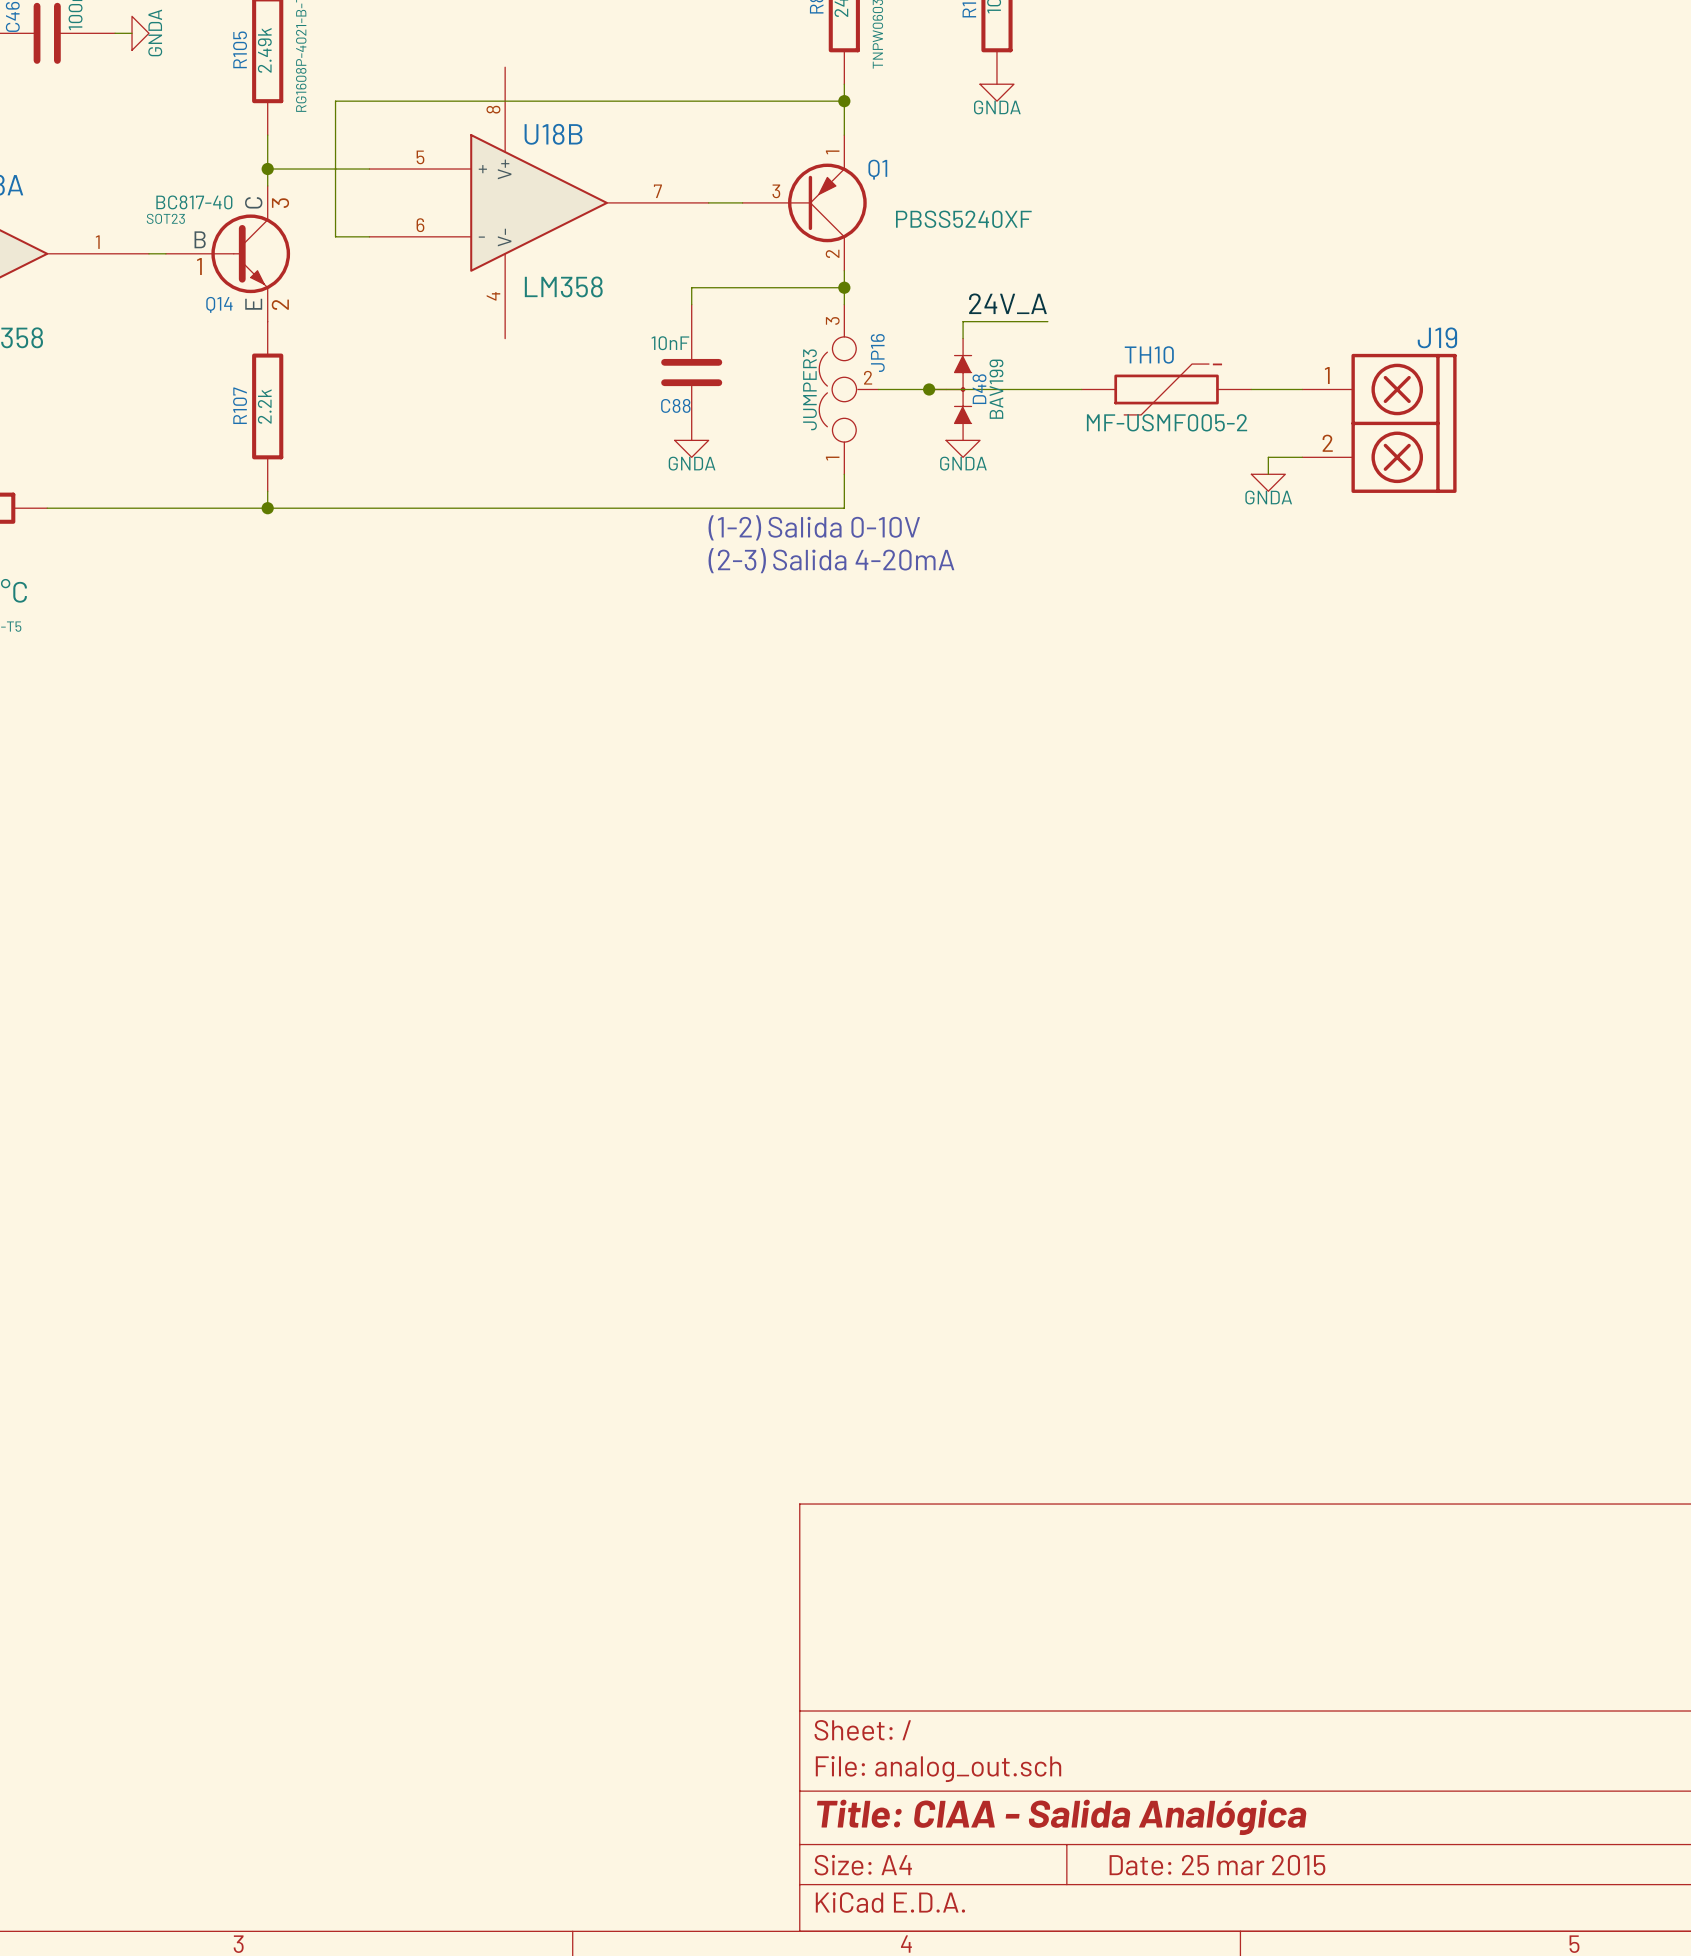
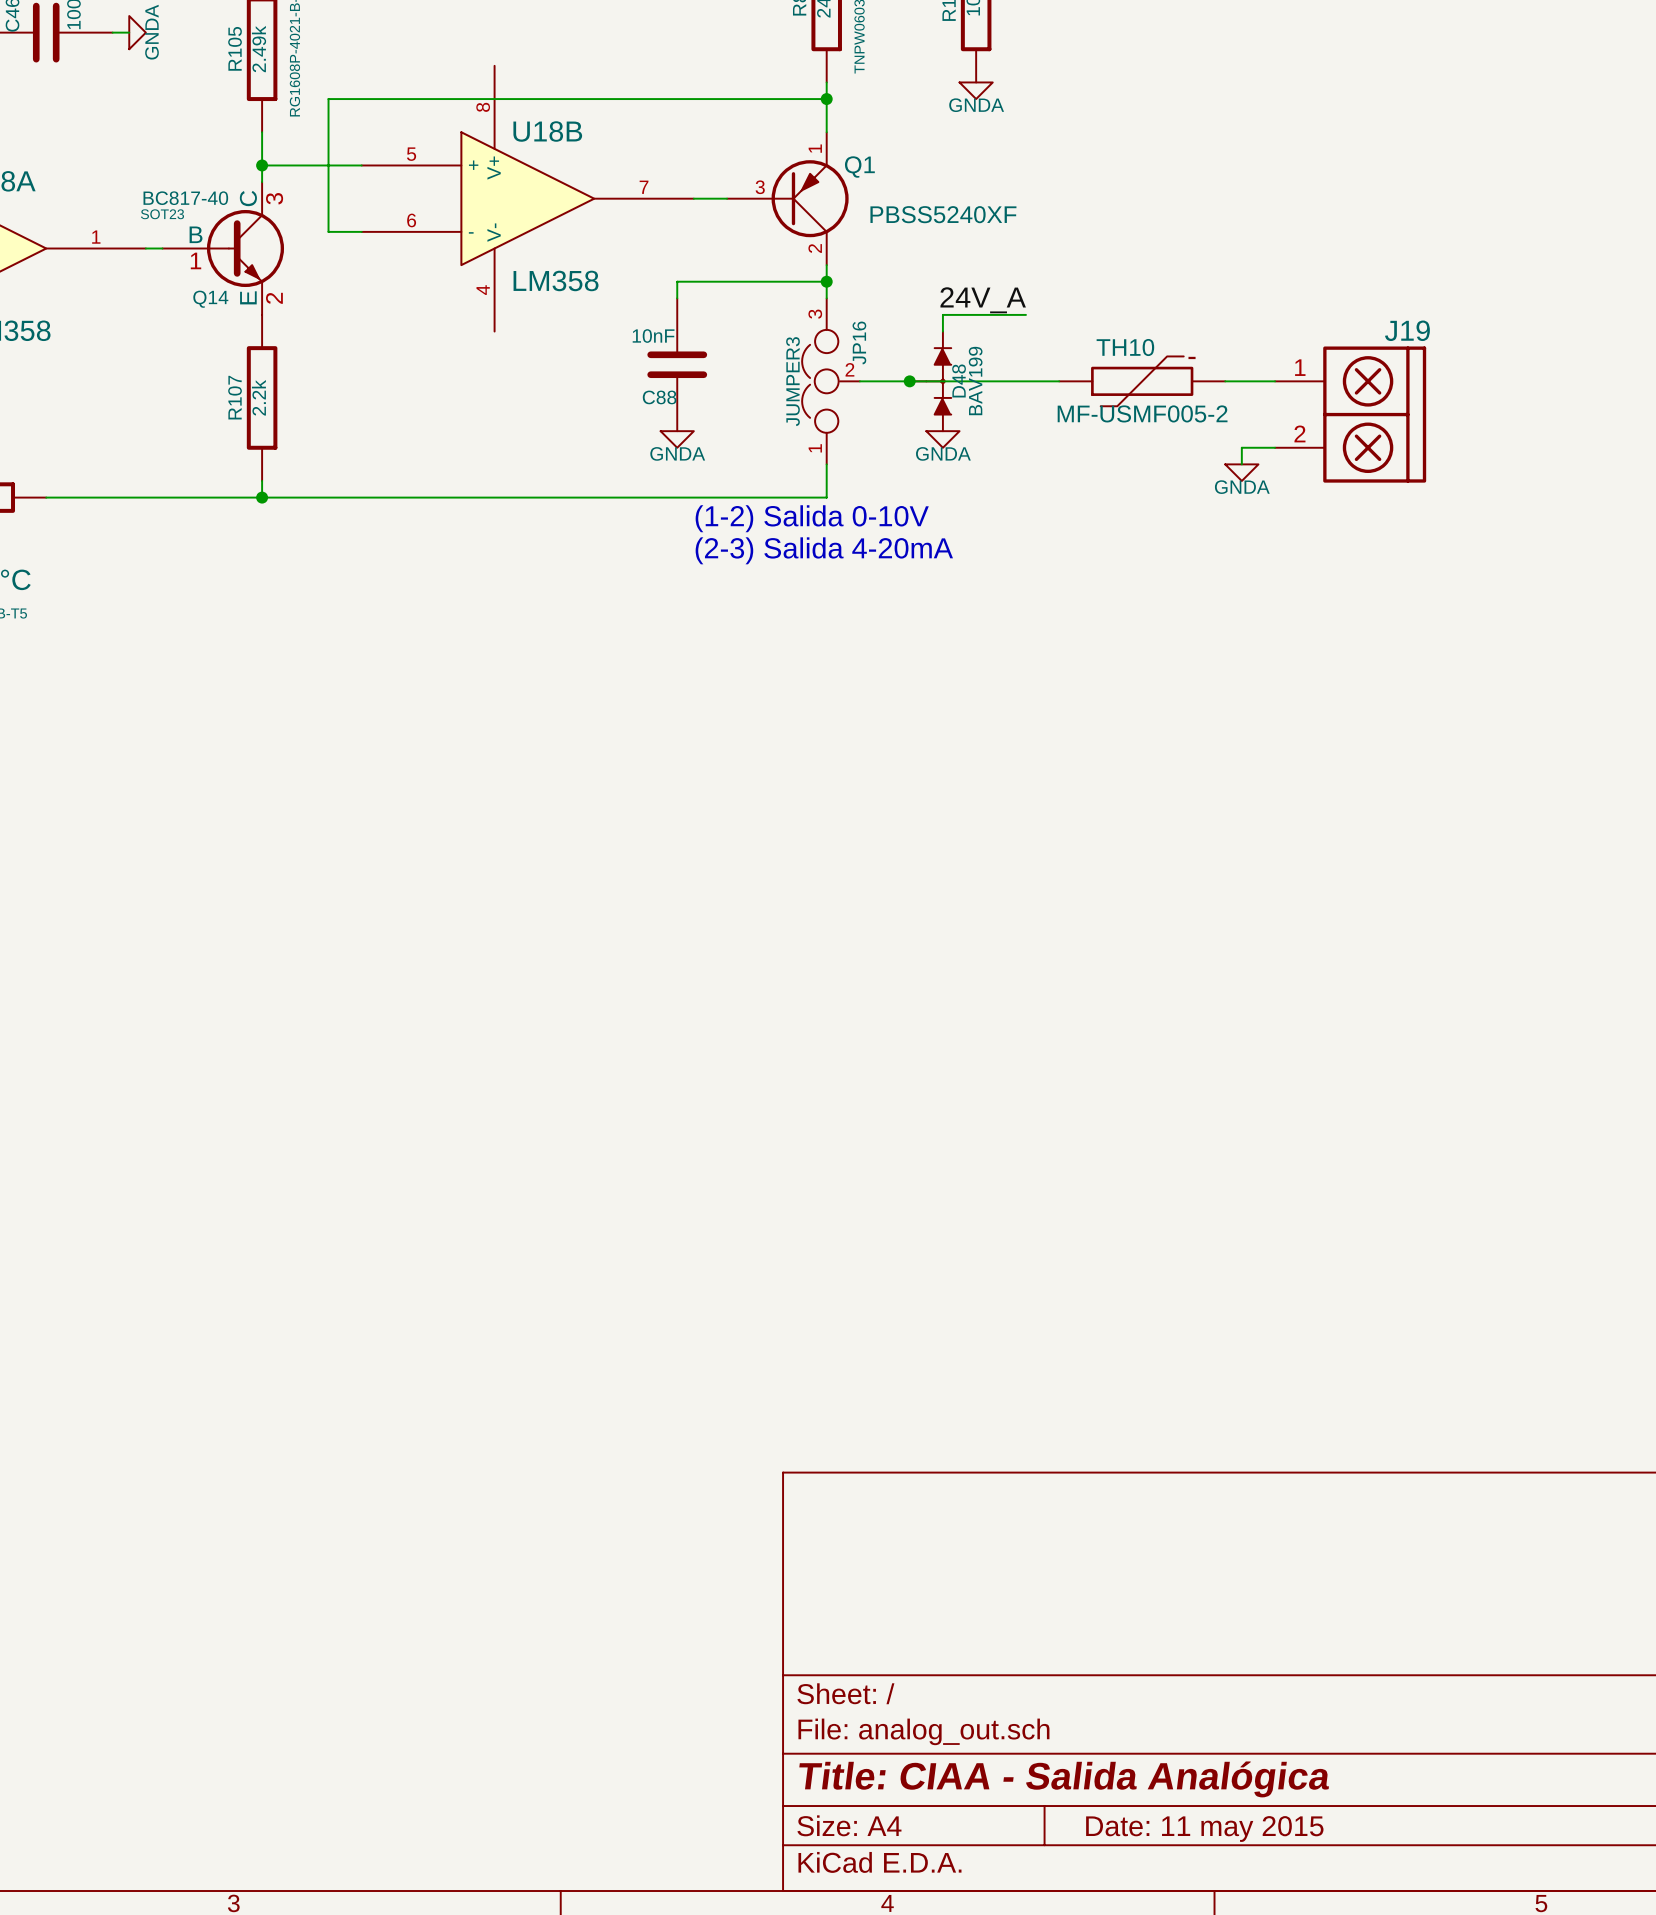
title block: Date: 25 mar 2015 (1217, 1865) -> Date: 11 may 2015 (1204, 1829)

